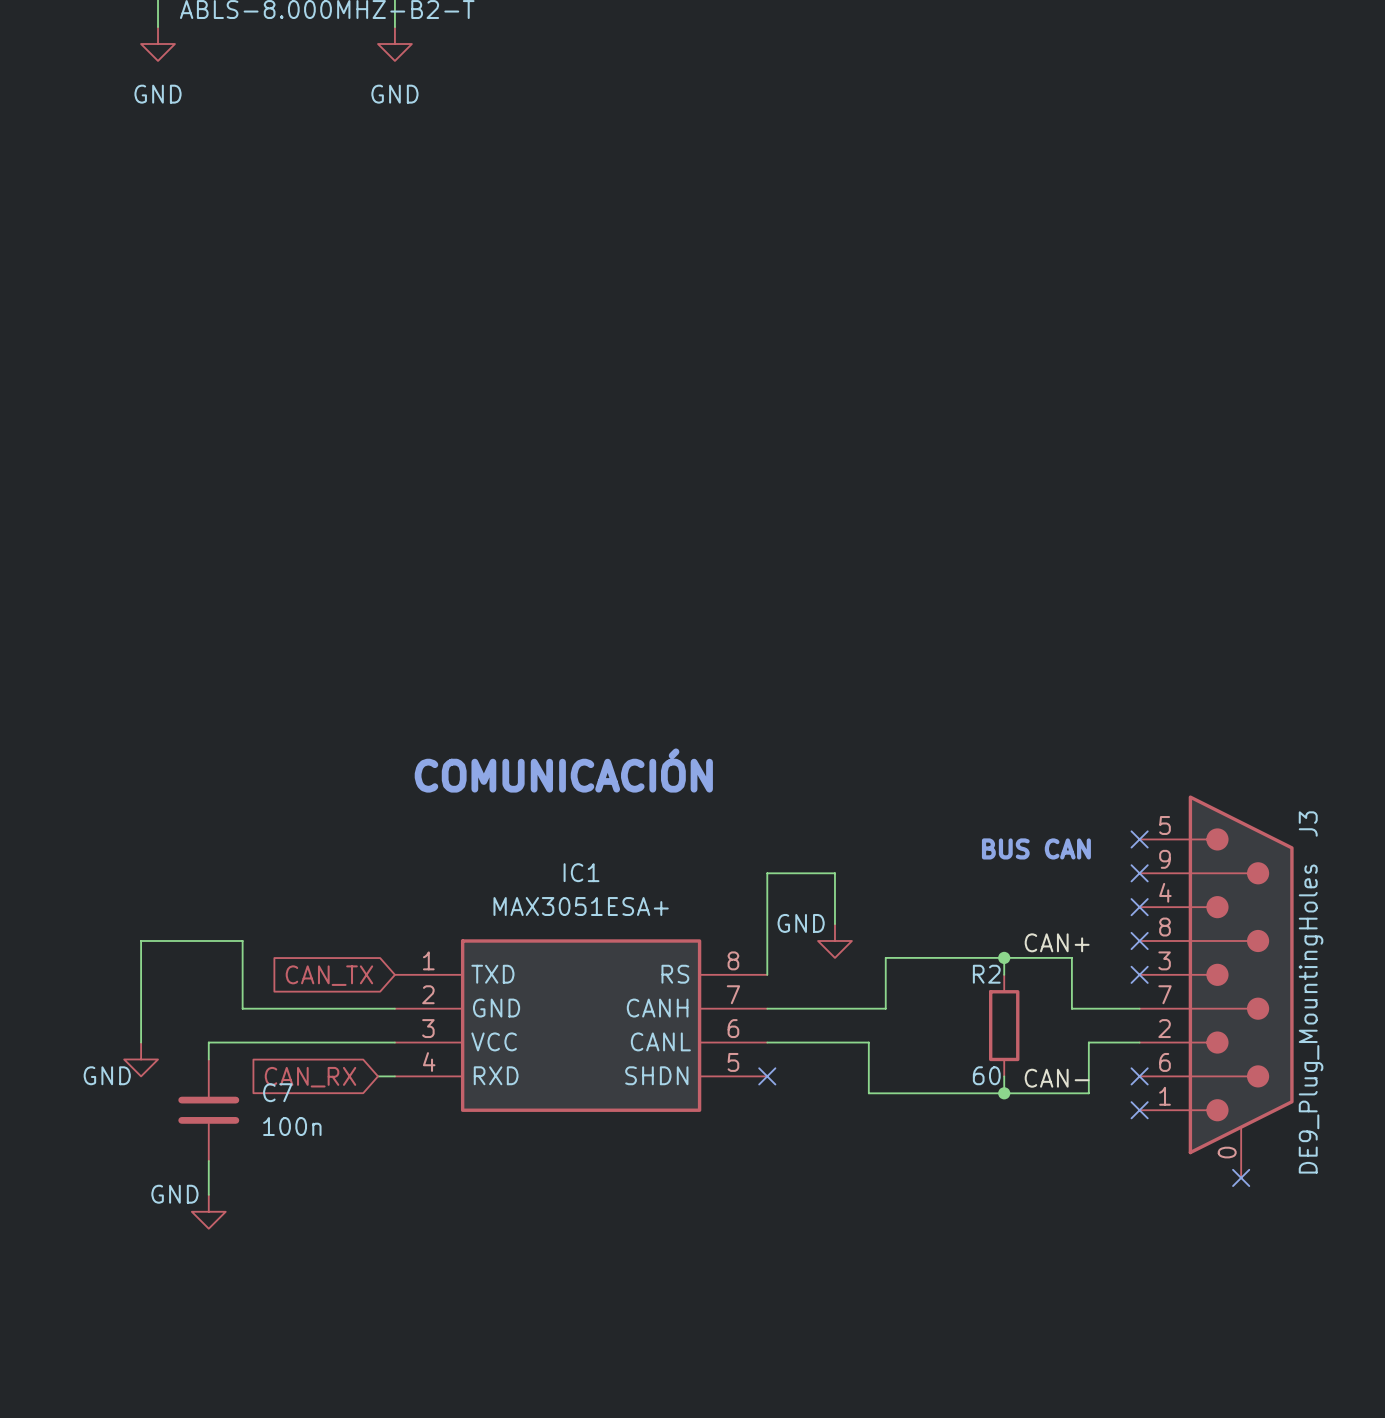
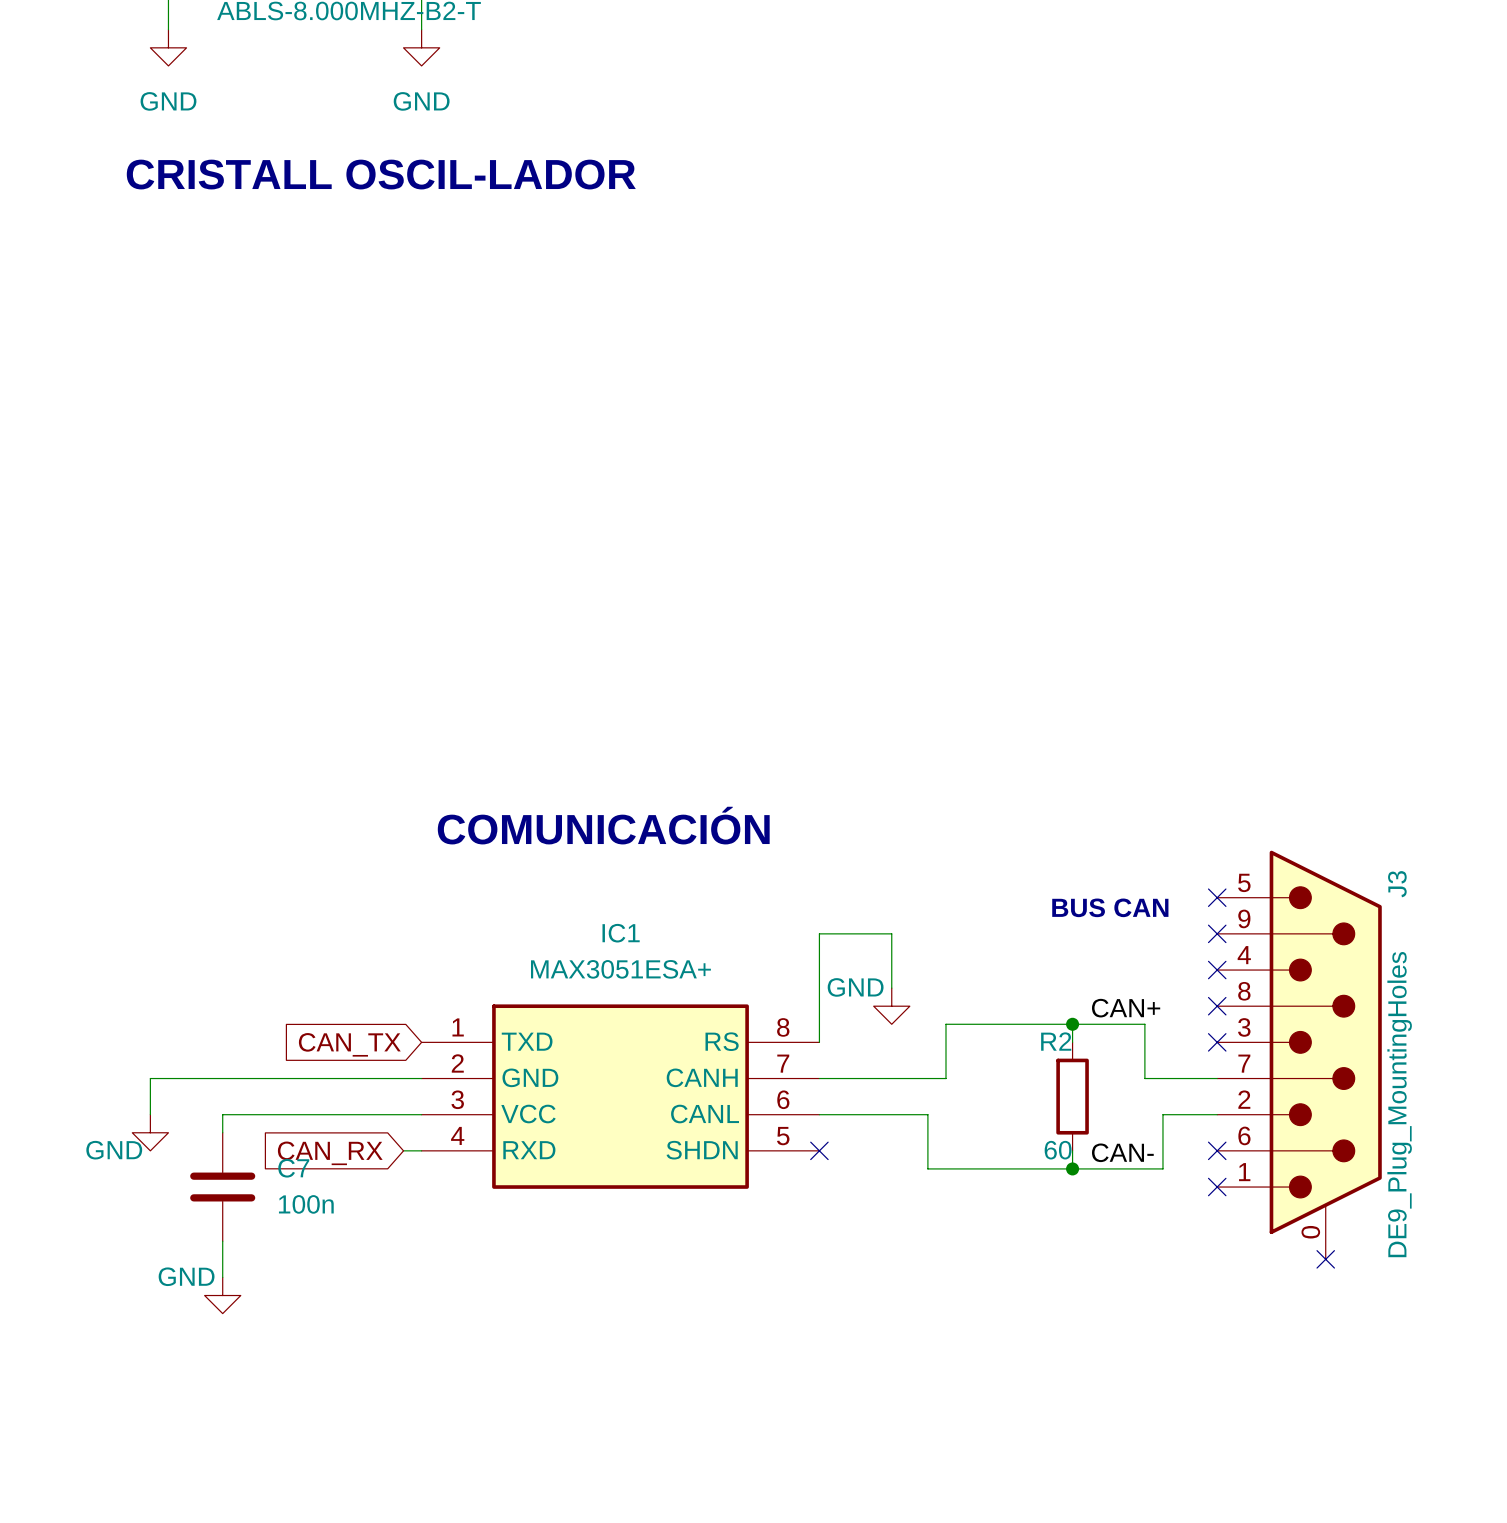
text: none -> CRISTALL OSCIL-LADOR (381, 174)
wire: (141, 1008) (141, 940) (242, 940) (242, 1008) -> (150, 1078) (258, 1078)

